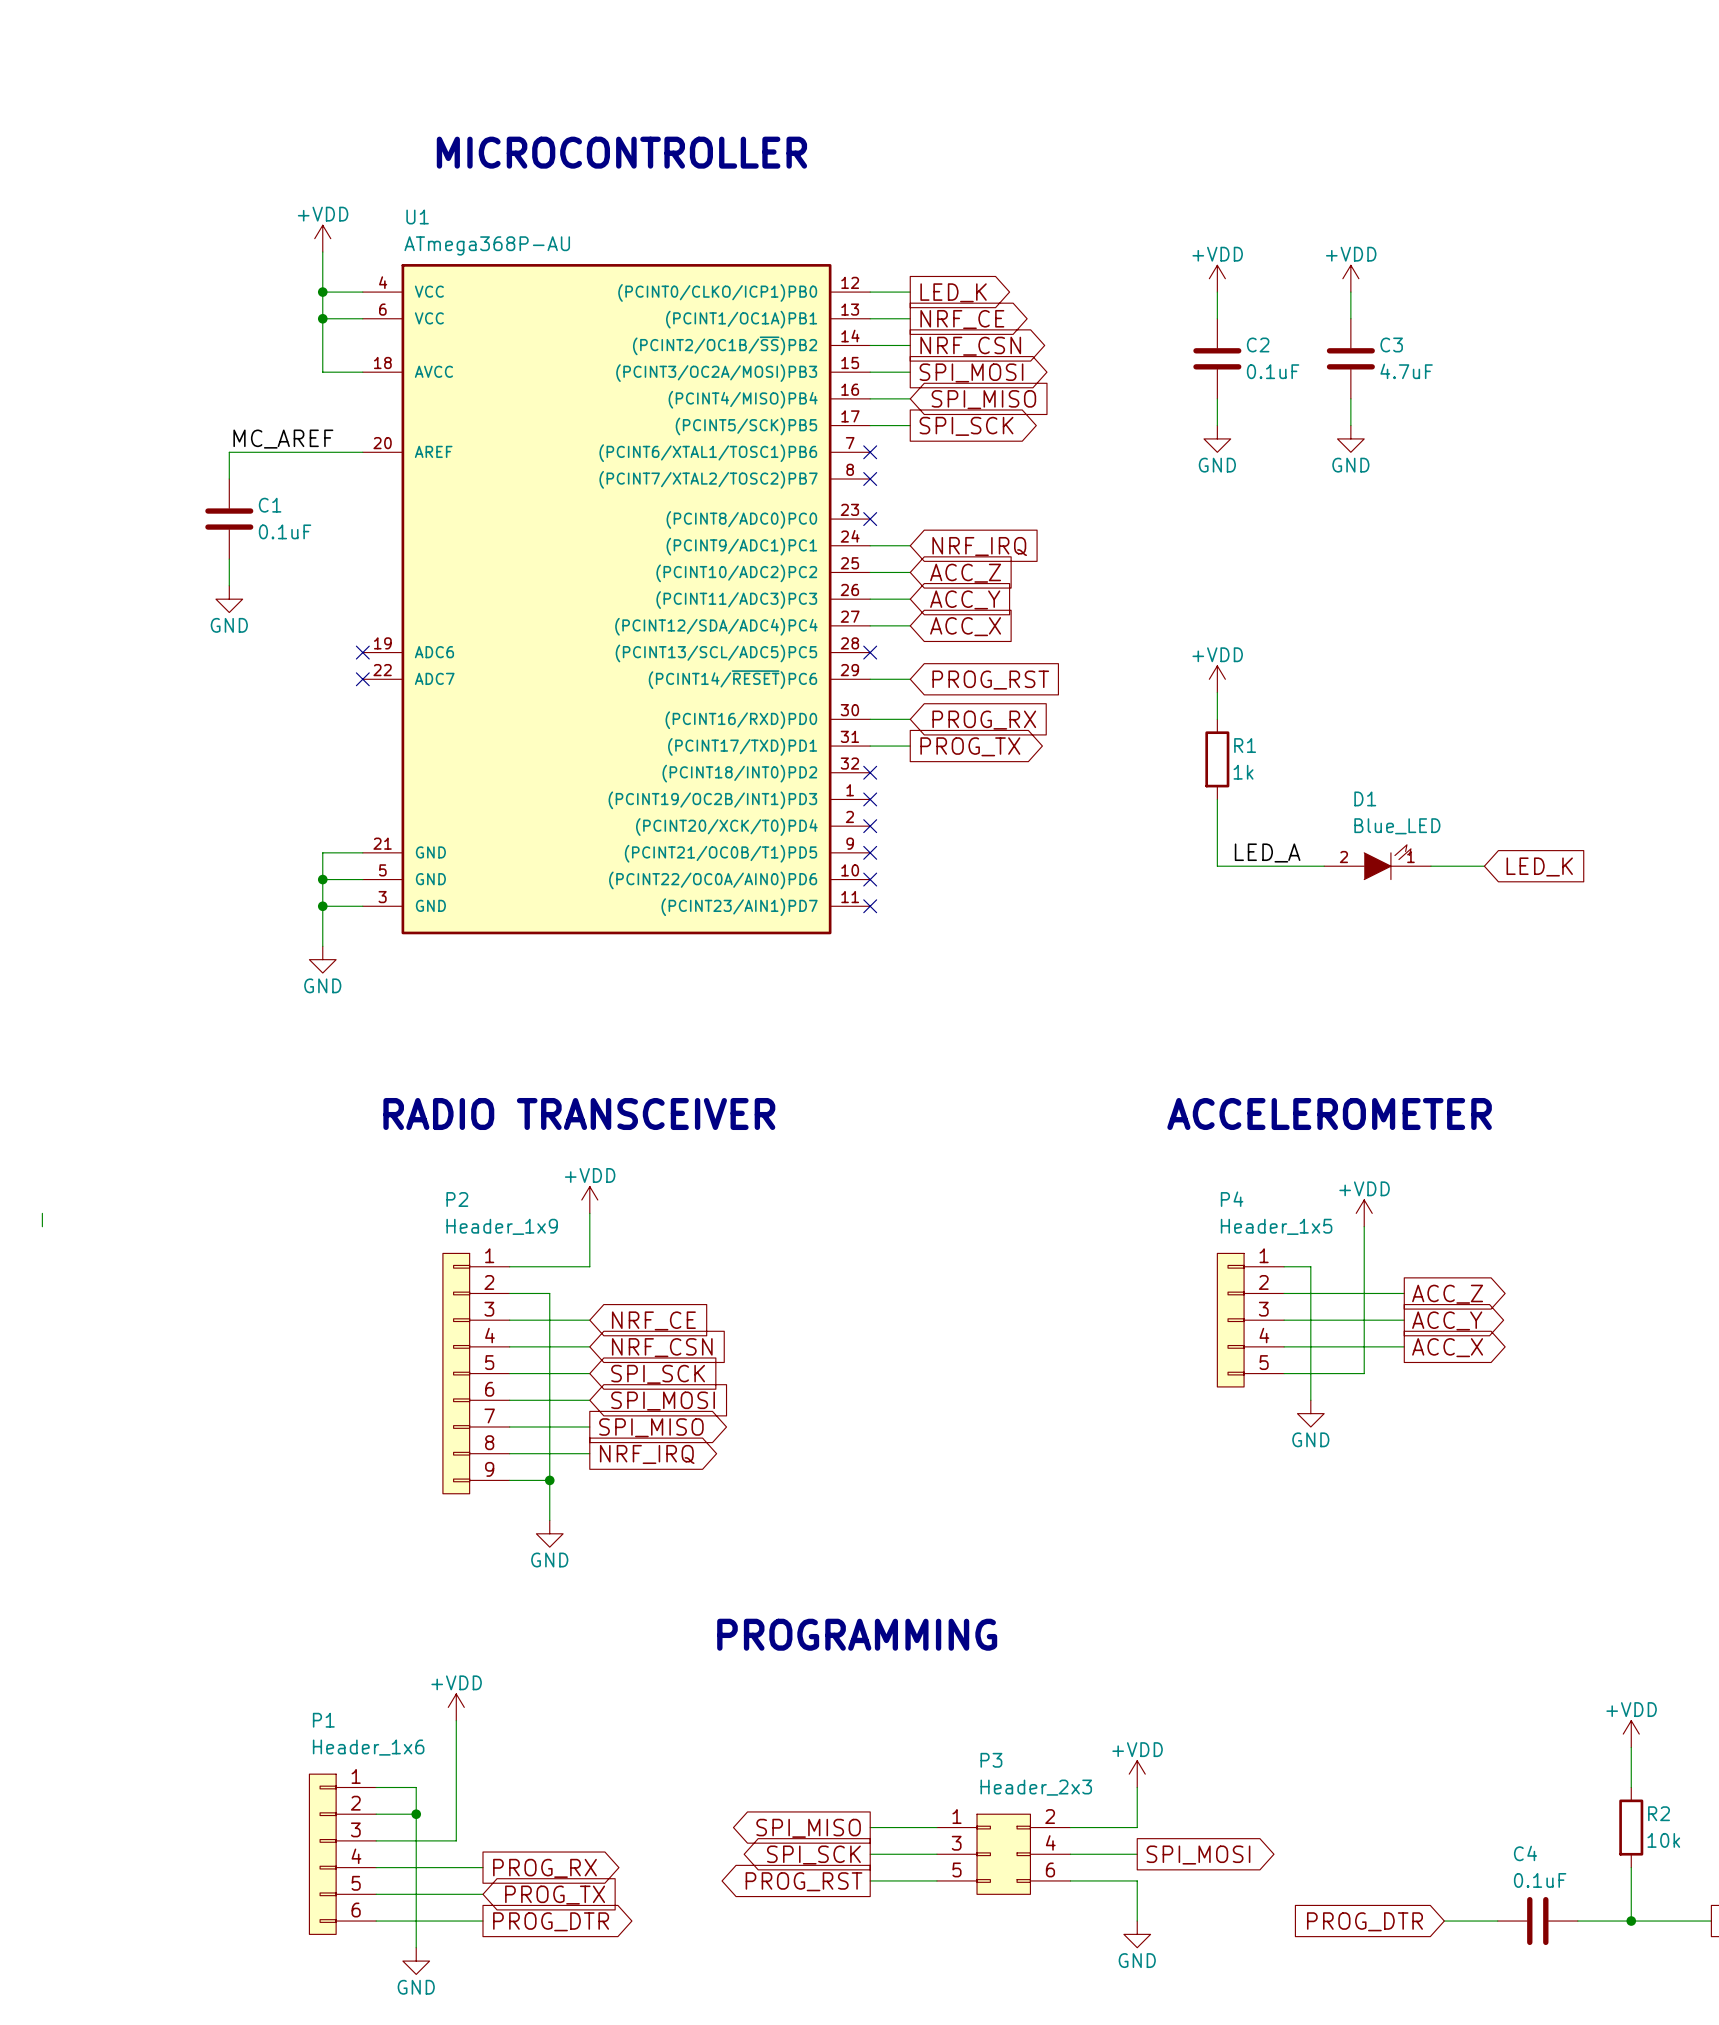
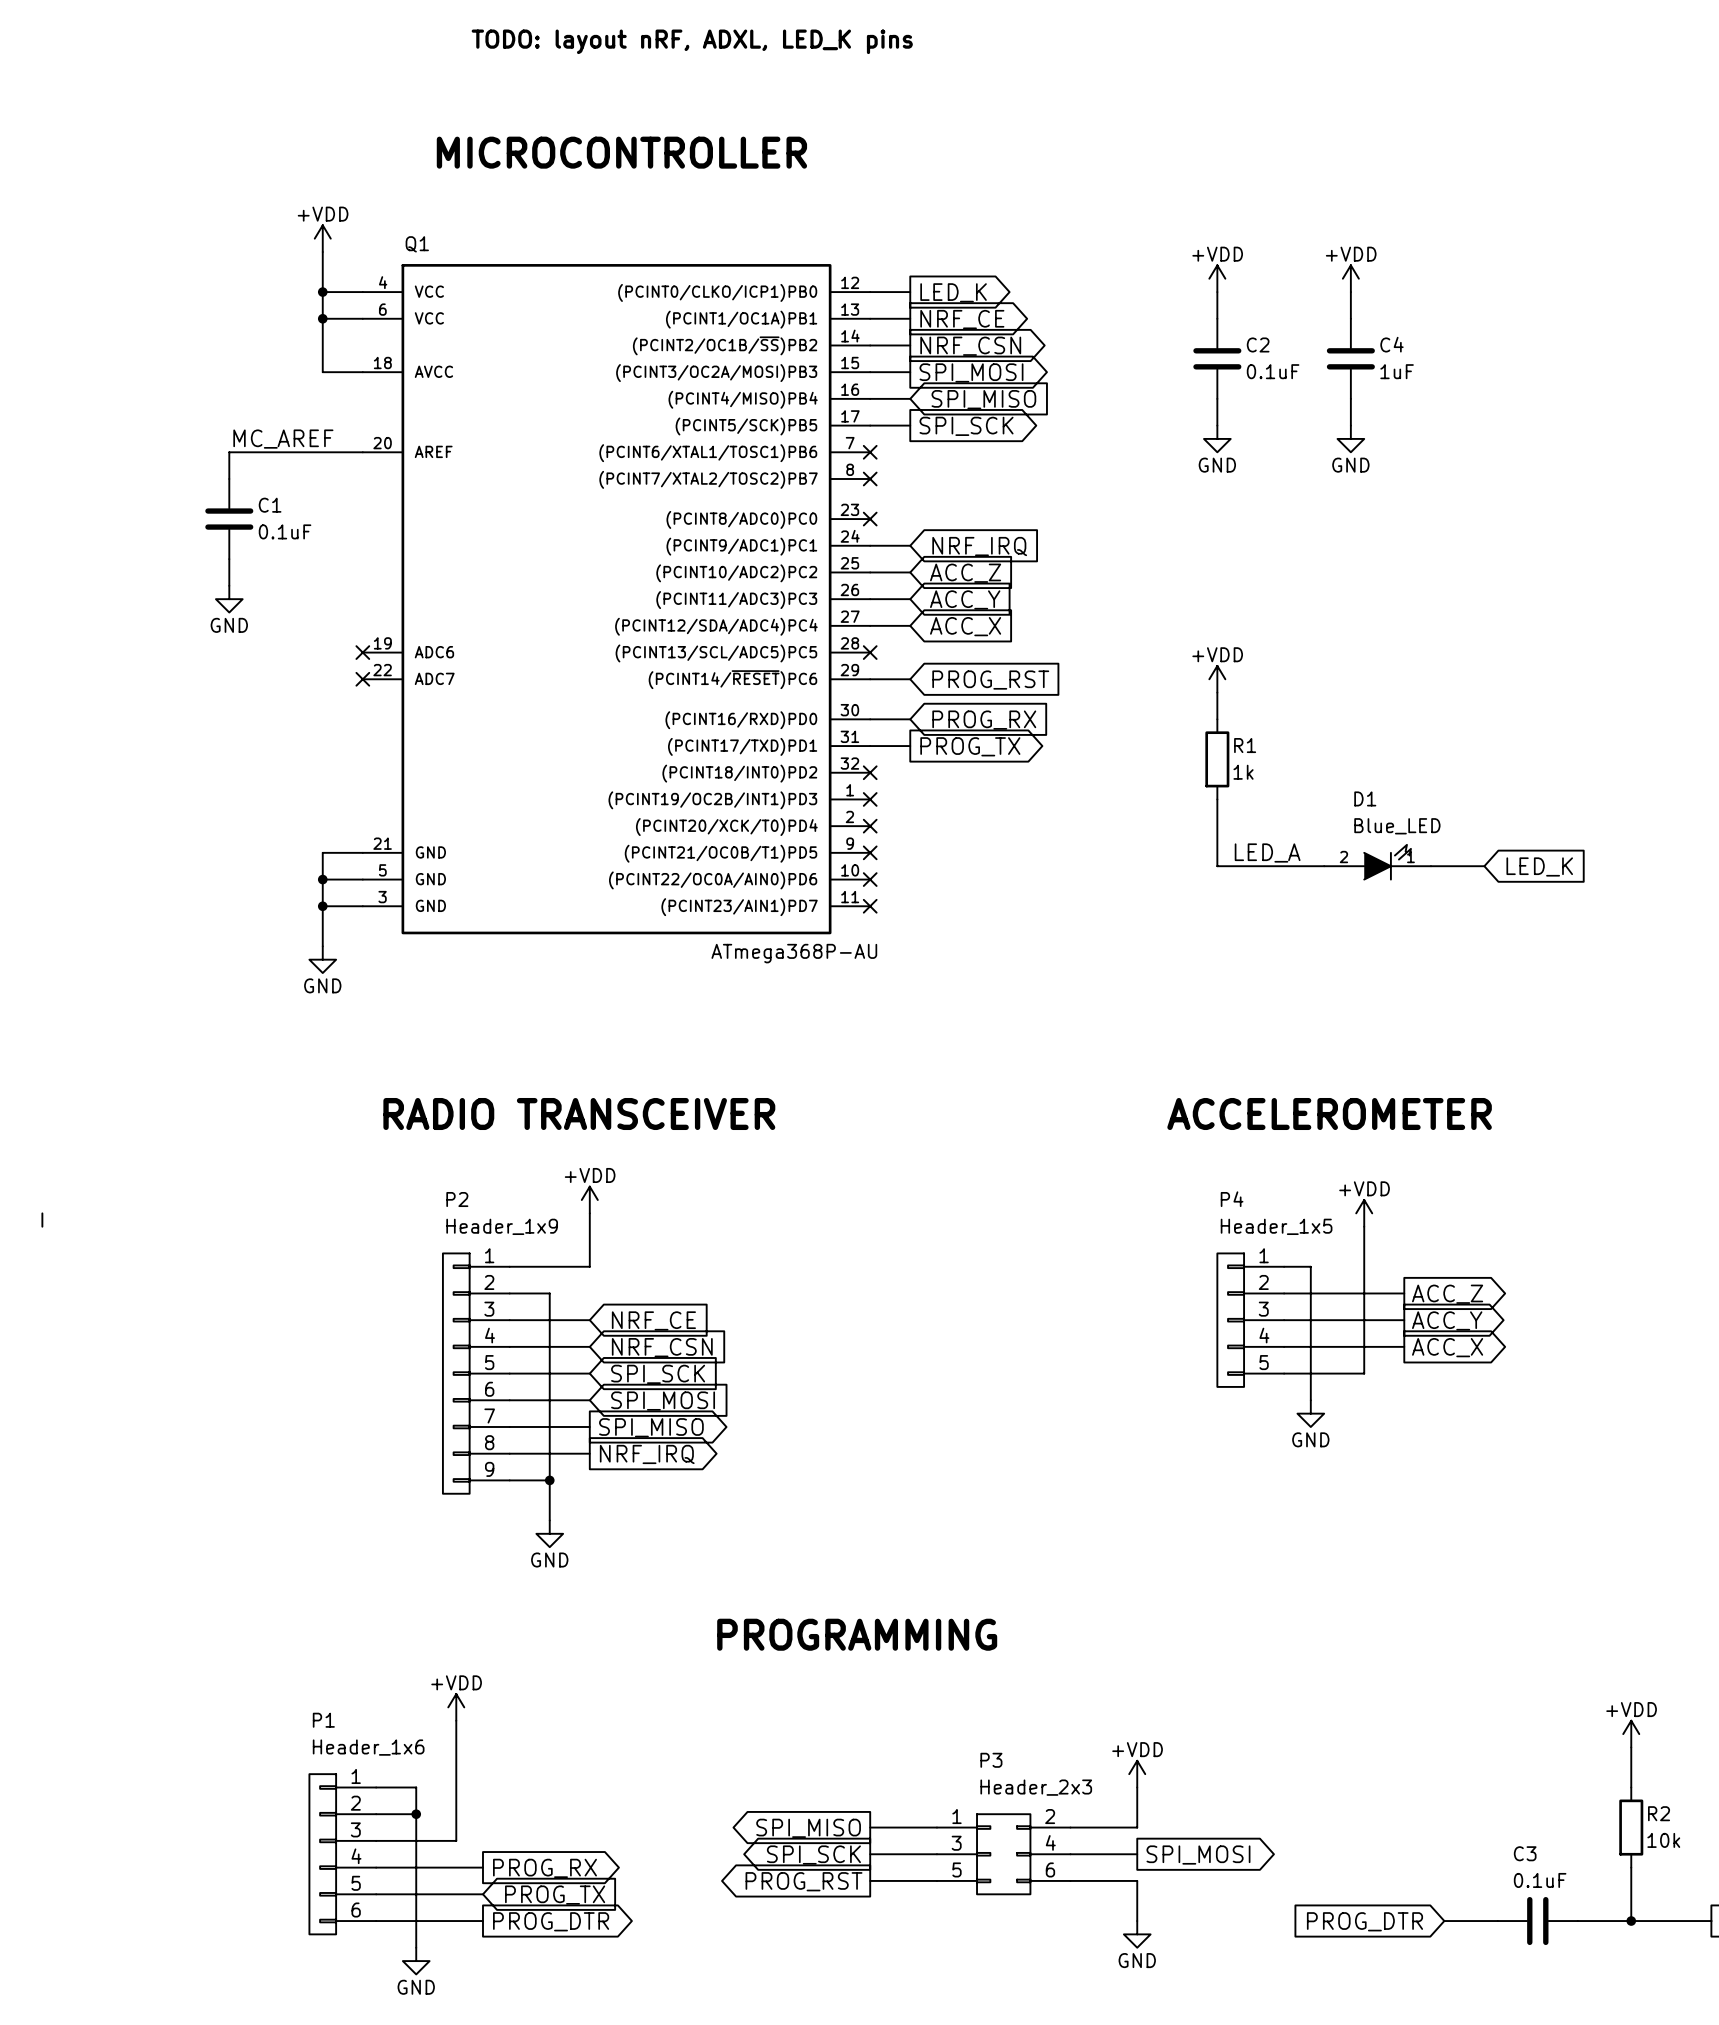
text: none -> TODO: layout nRF, ADXL, LED_K pins (692, 41)
U1 name: U1 (417, 217) -> Q1 (417, 244)
U1 value position: ATmega368P-AU (487, 245) -> ATmega368P-AU (794, 953)
C3 name: C3 (1391, 344) -> C4 (1391, 344)
C3 value: 4.7uF (1406, 371) -> 1uF (1397, 371)
C4 name: C4 (1525, 1853) -> C3 (1525, 1853)

